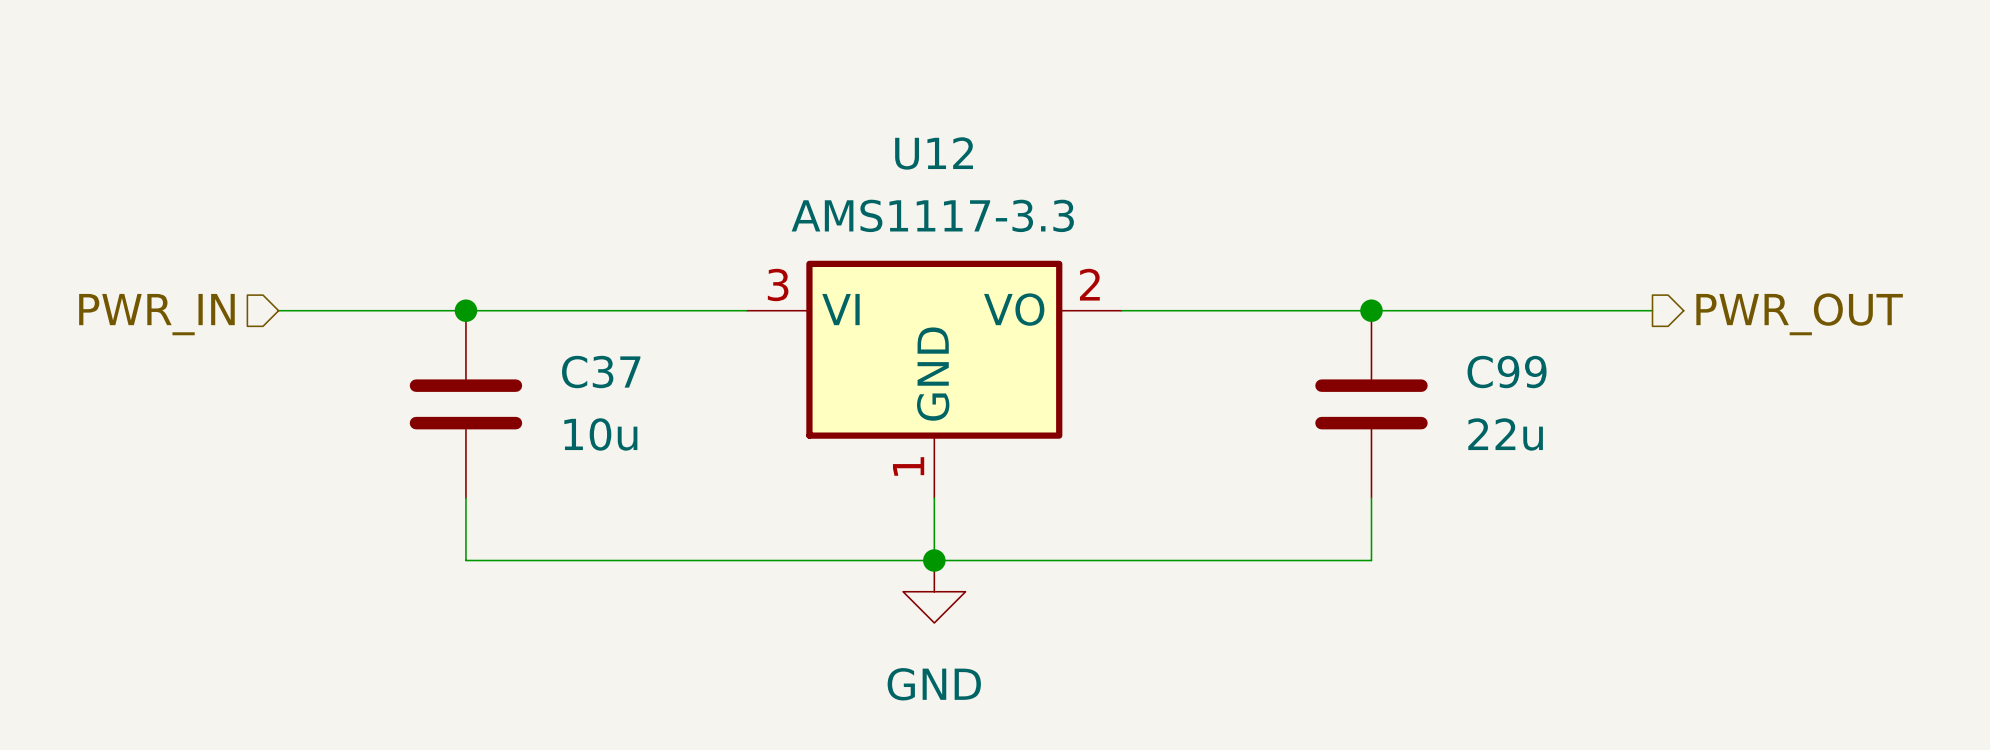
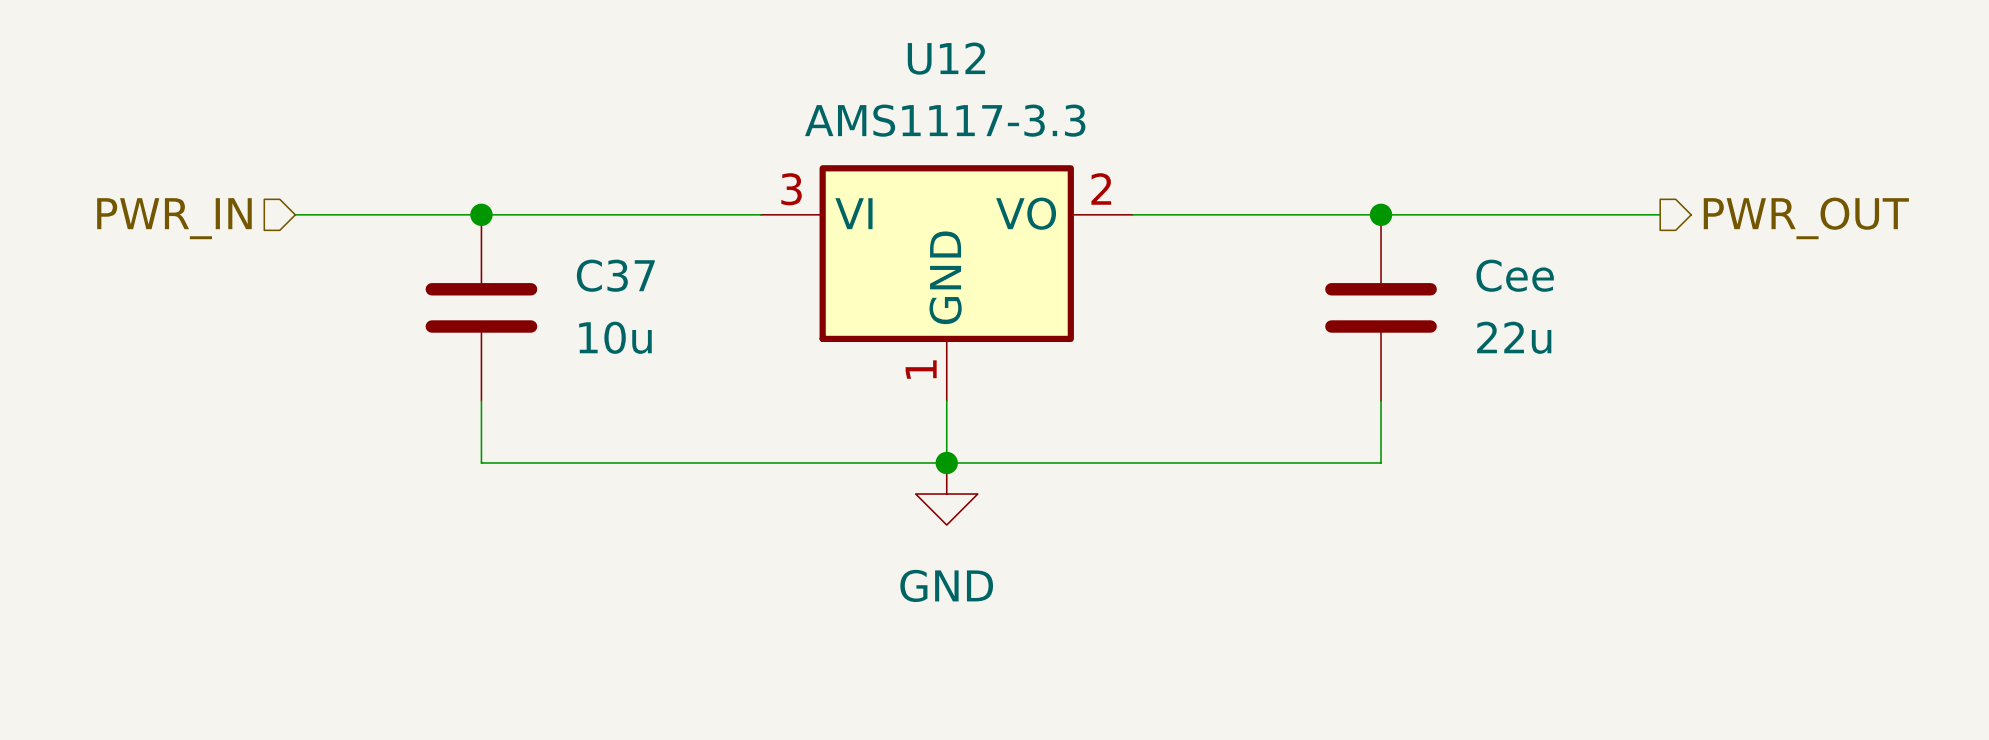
C99 name: C99 (1507, 372) -> Cee (1515, 275)

